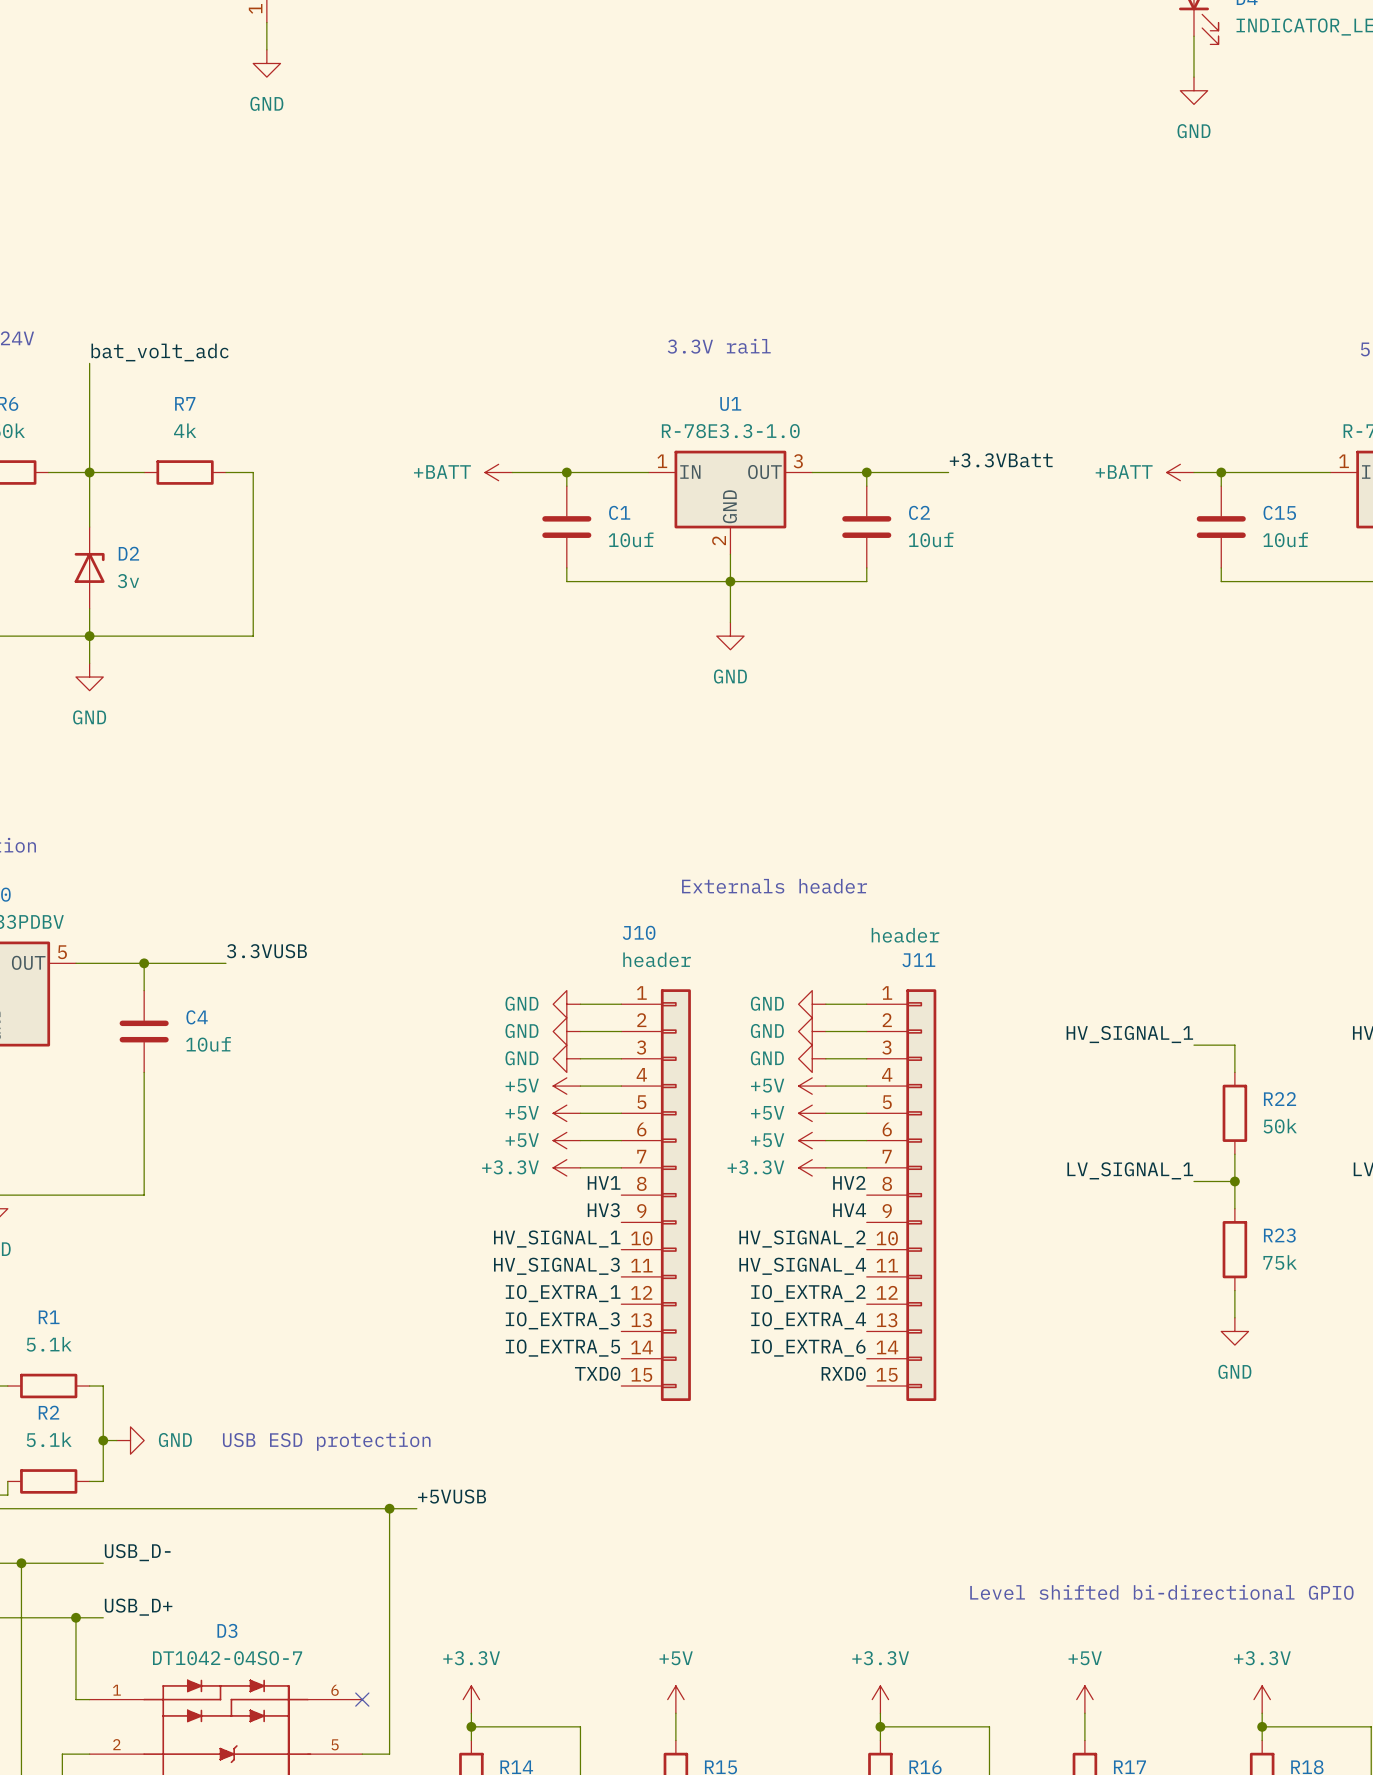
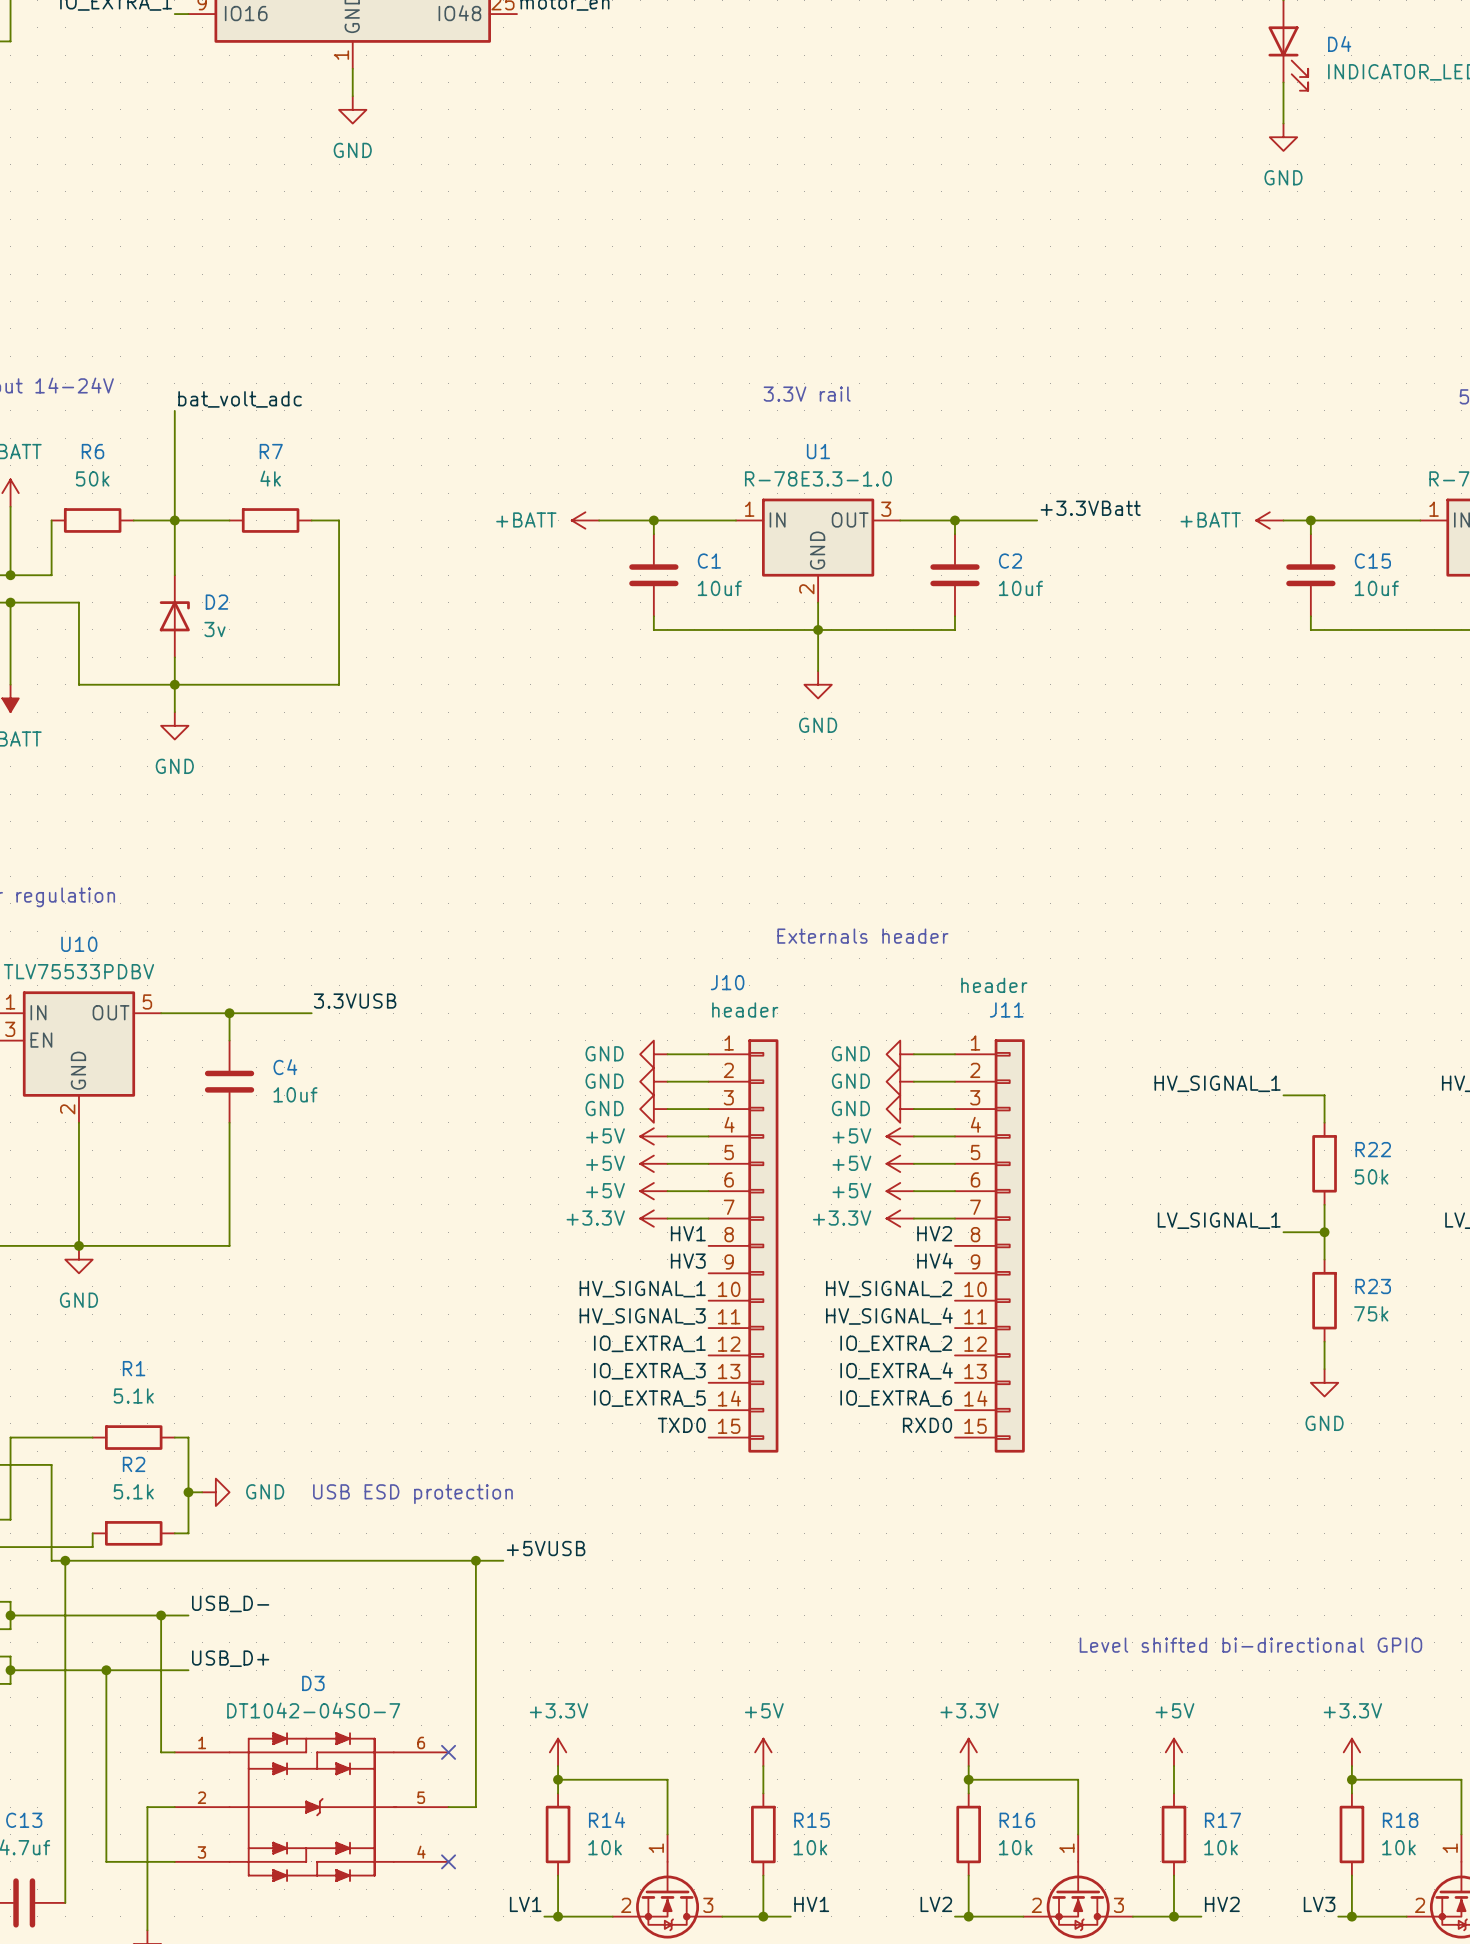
wire: (21, 1563) (21, 1617) -> (161, 1615) (161, 1670)
junction: (21, 1563) -> none
junction: none -> (161, 1615)
junction: none -> (106, 1670)
junction: (75, 1617) -> none

